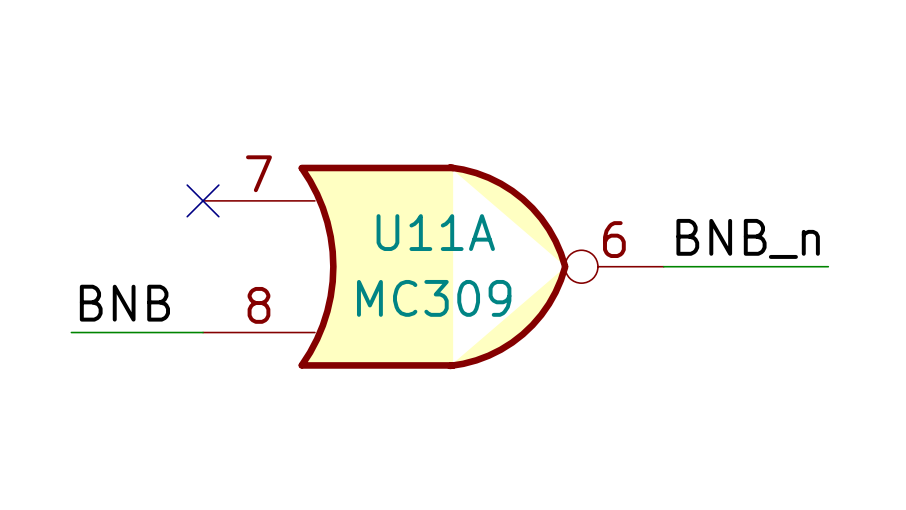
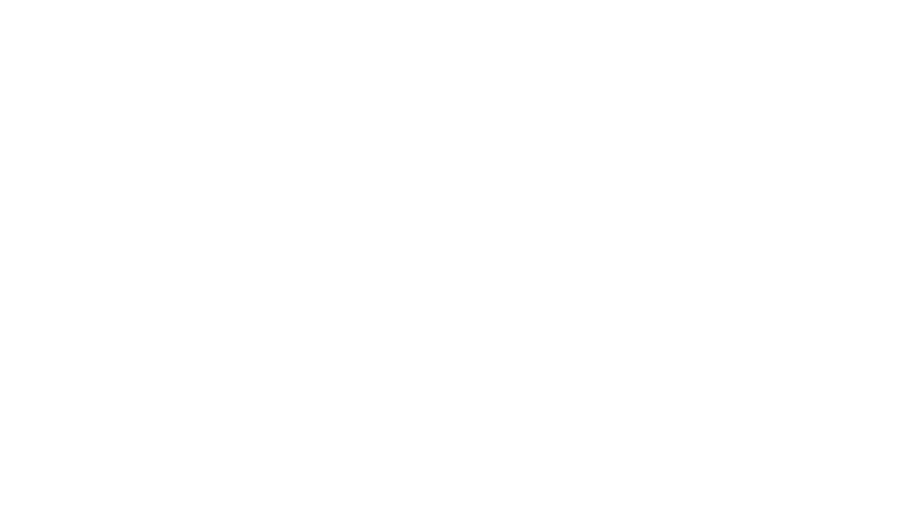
no-connect mark: (203, 200) -> none
label: BNB_n (748, 238) -> none
U11A: MC309 (433, 266) -> none
wire: (663, 266) (828, 266) -> none
label: BNB (124, 303) -> none
wire: (71, 332) (203, 332) -> none

